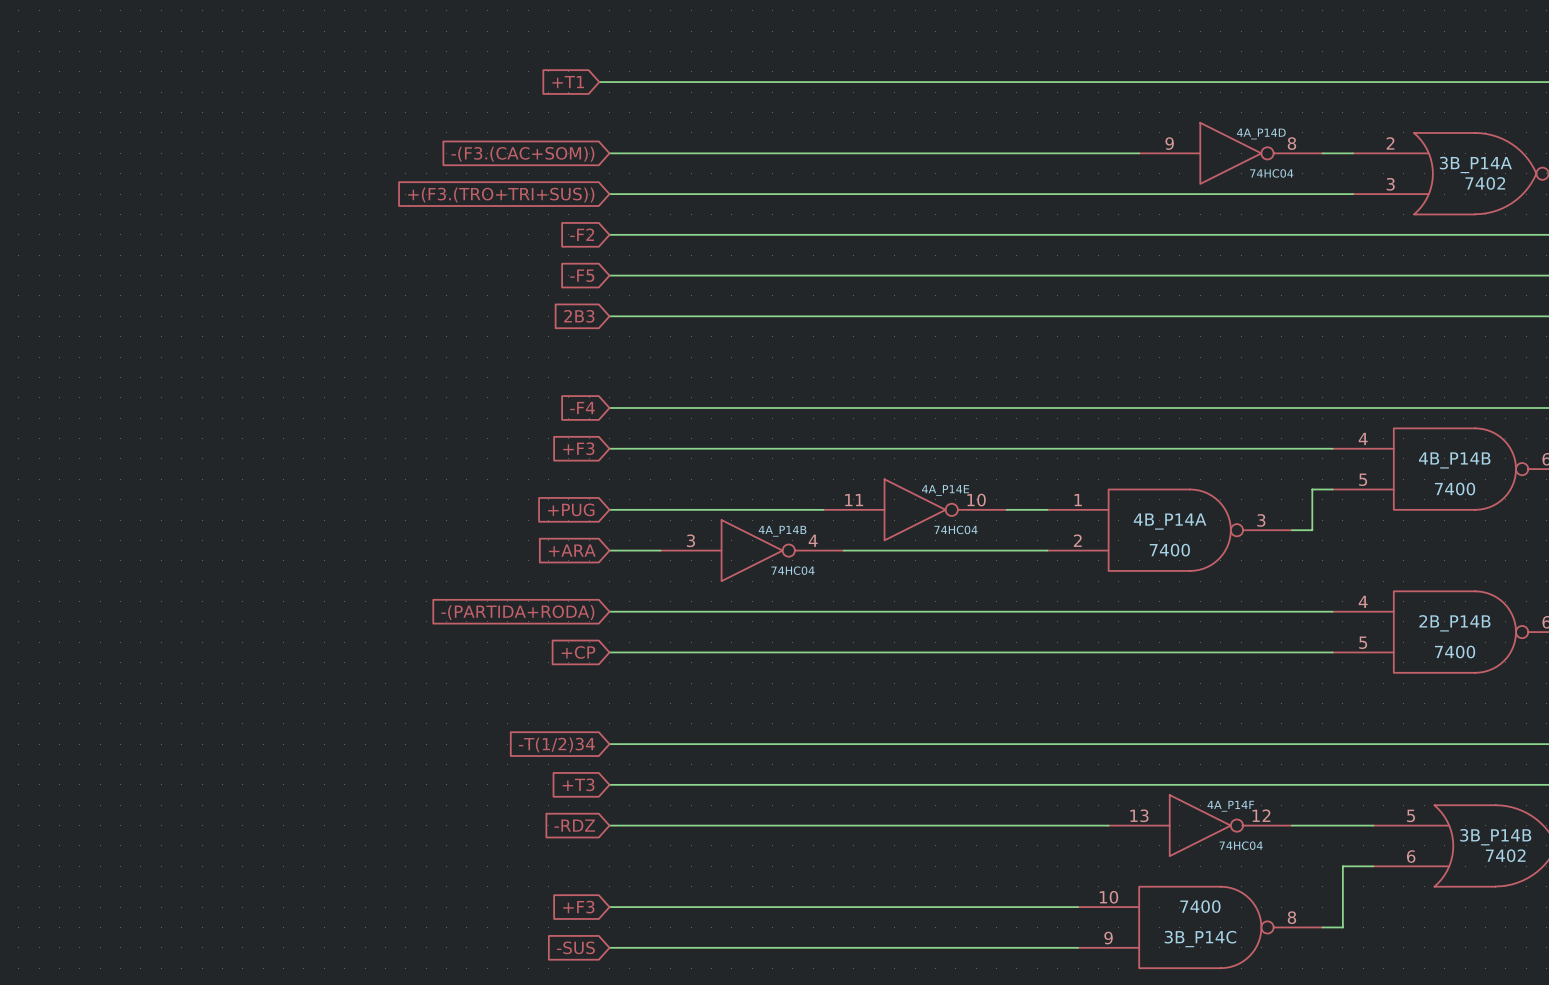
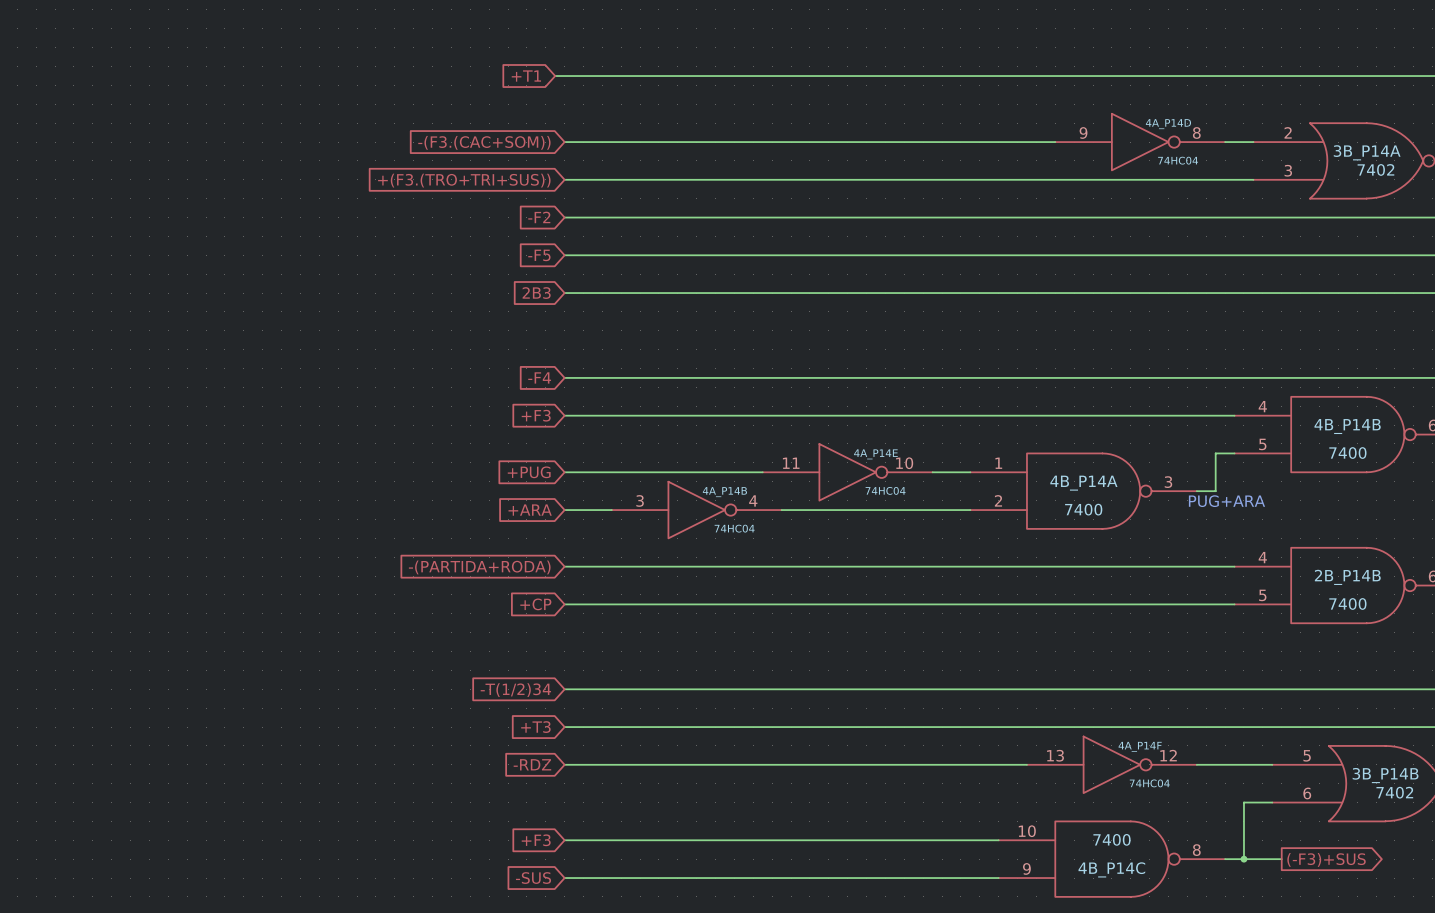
text: none -> PUG+ARA (1226, 501)
wire: none -> (1243, 859) (1281, 859)
junction: none -> (1243, 859)
global label: none -> (-F3)+SUS (1326, 859)
3B_P14C name: 3B_P14C (1200, 939) -> 4B_P14C (1111, 869)

